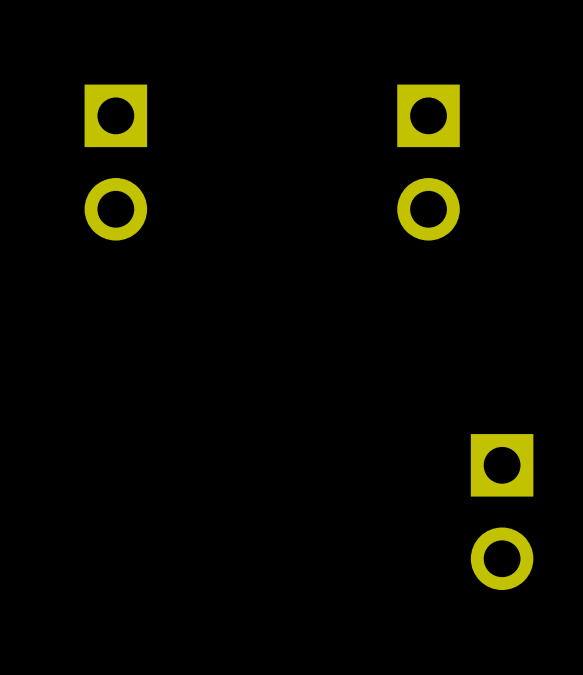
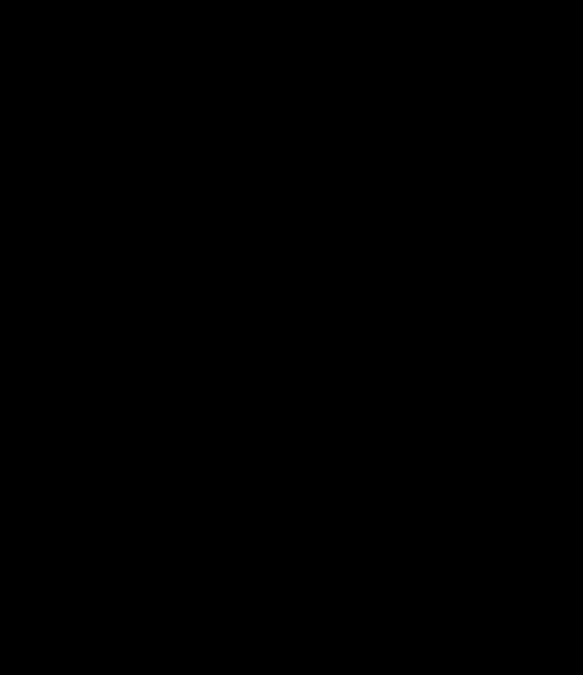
part: (115, 162) -> none
part: (428, 162) -> none
part: (502, 512) -> none

